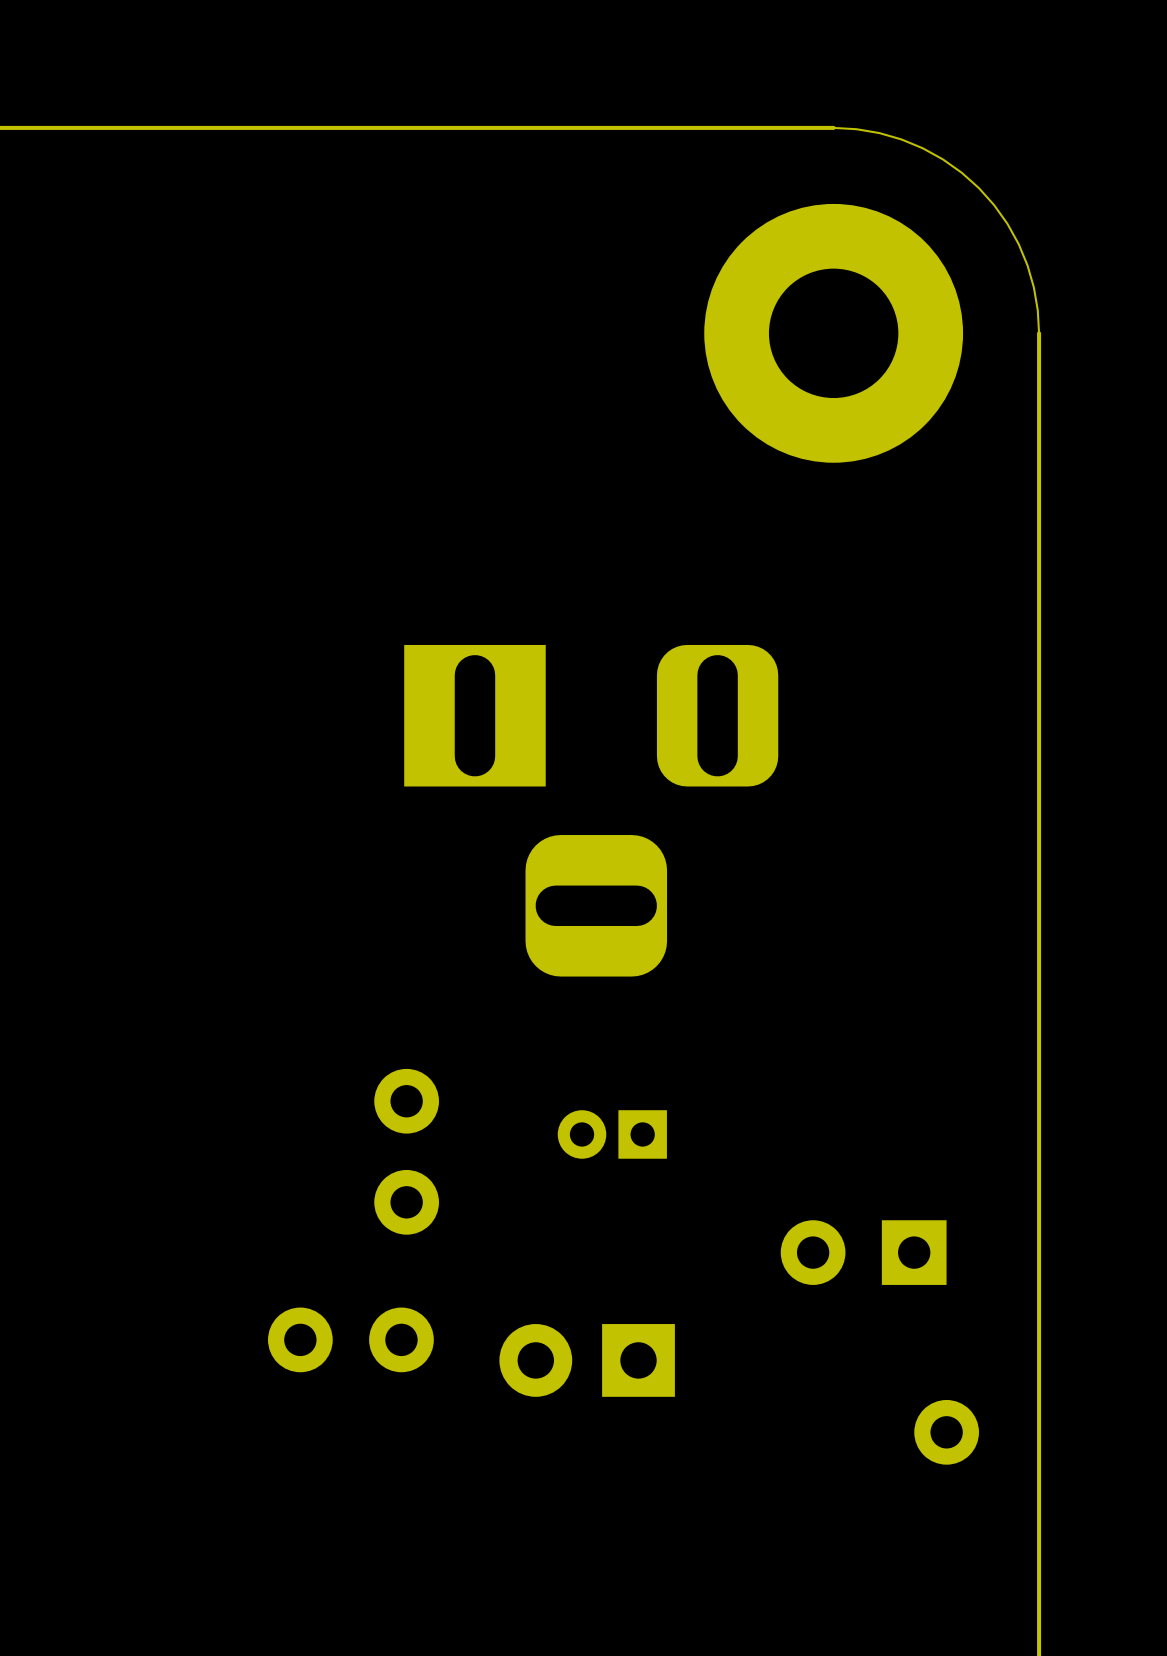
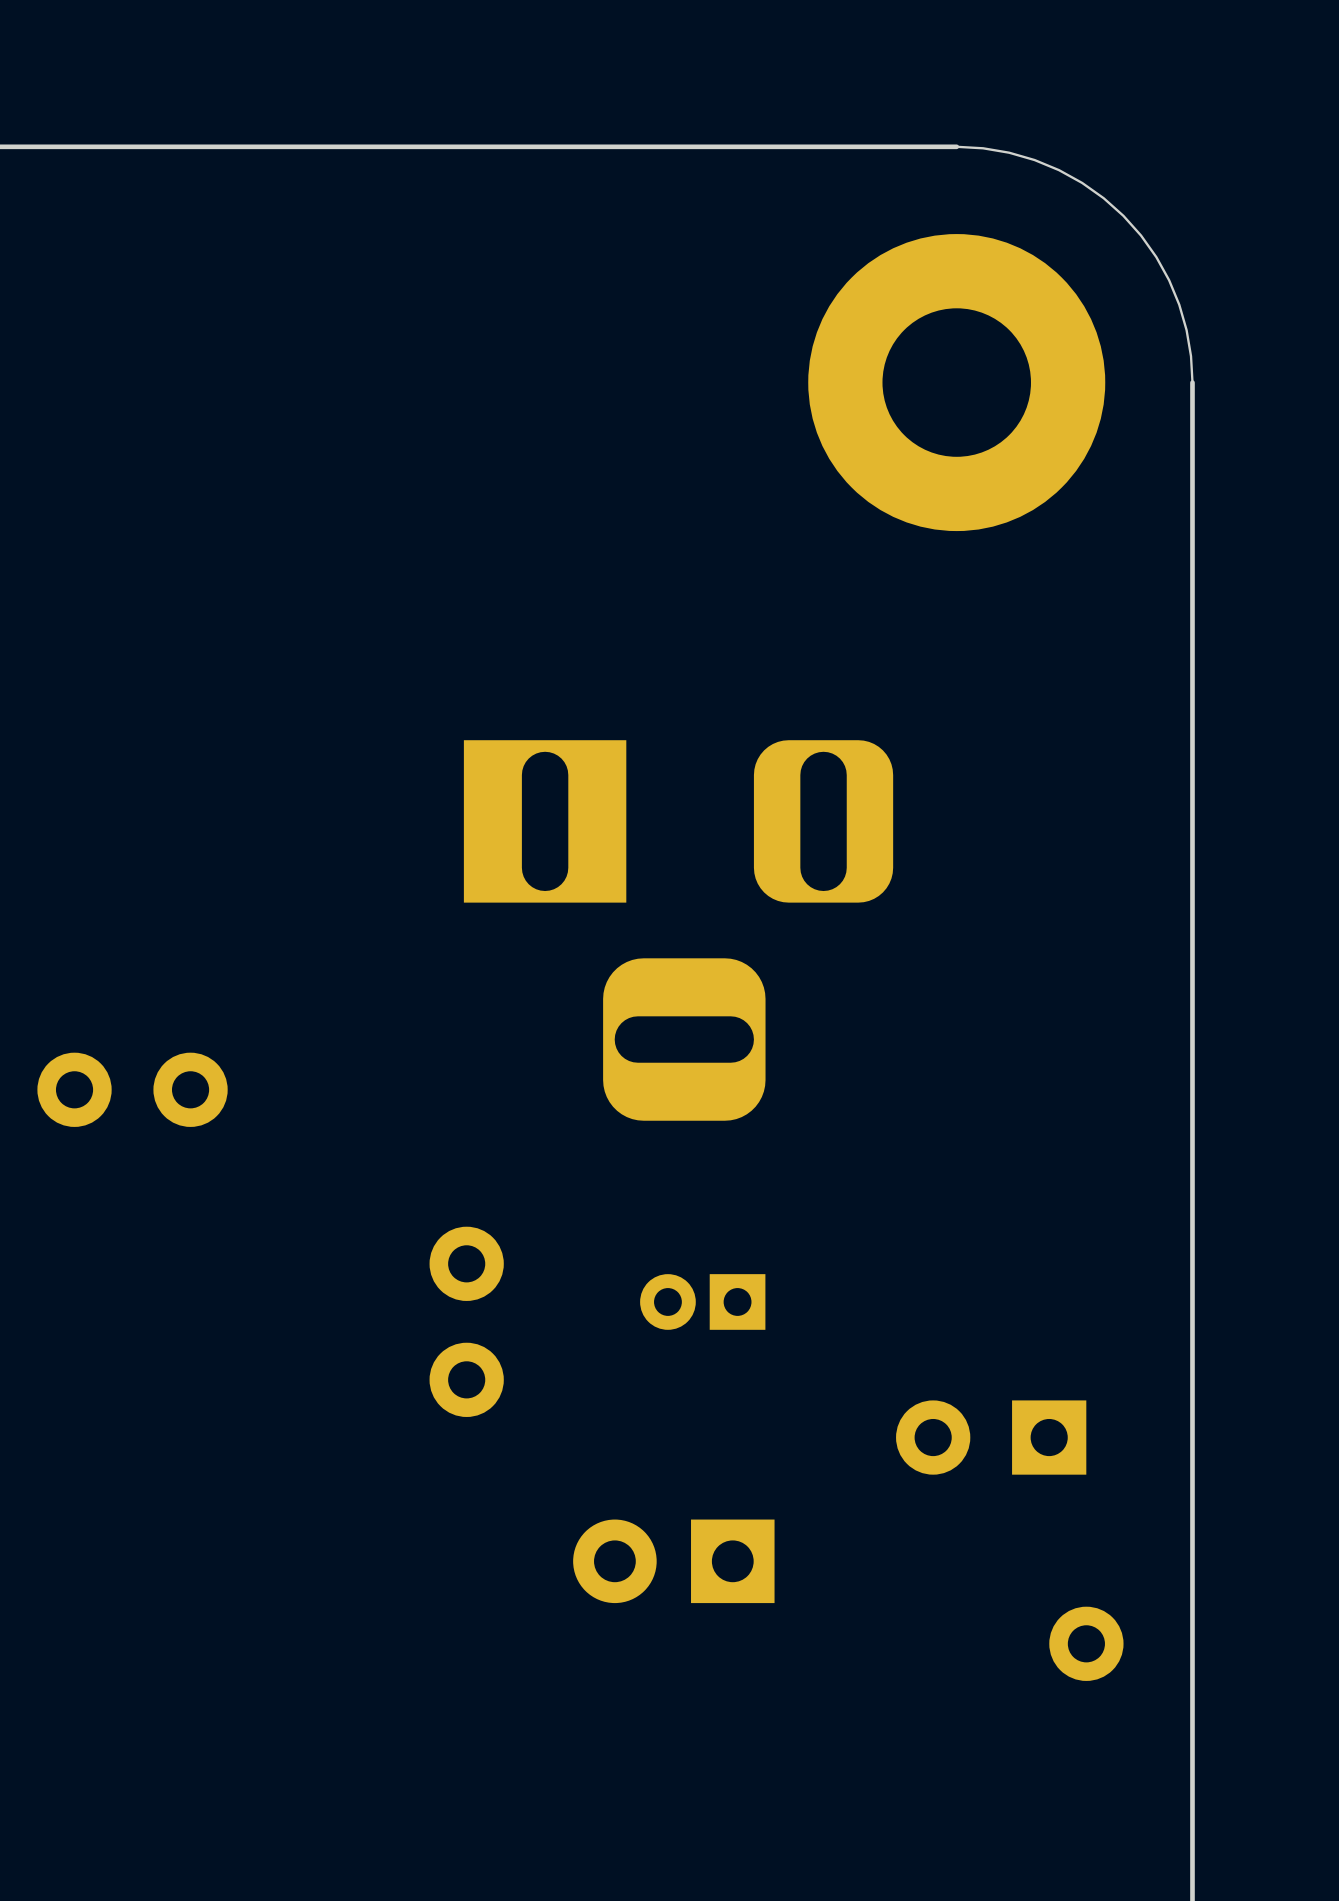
part position: (350, 1339) -> (132, 1089)

